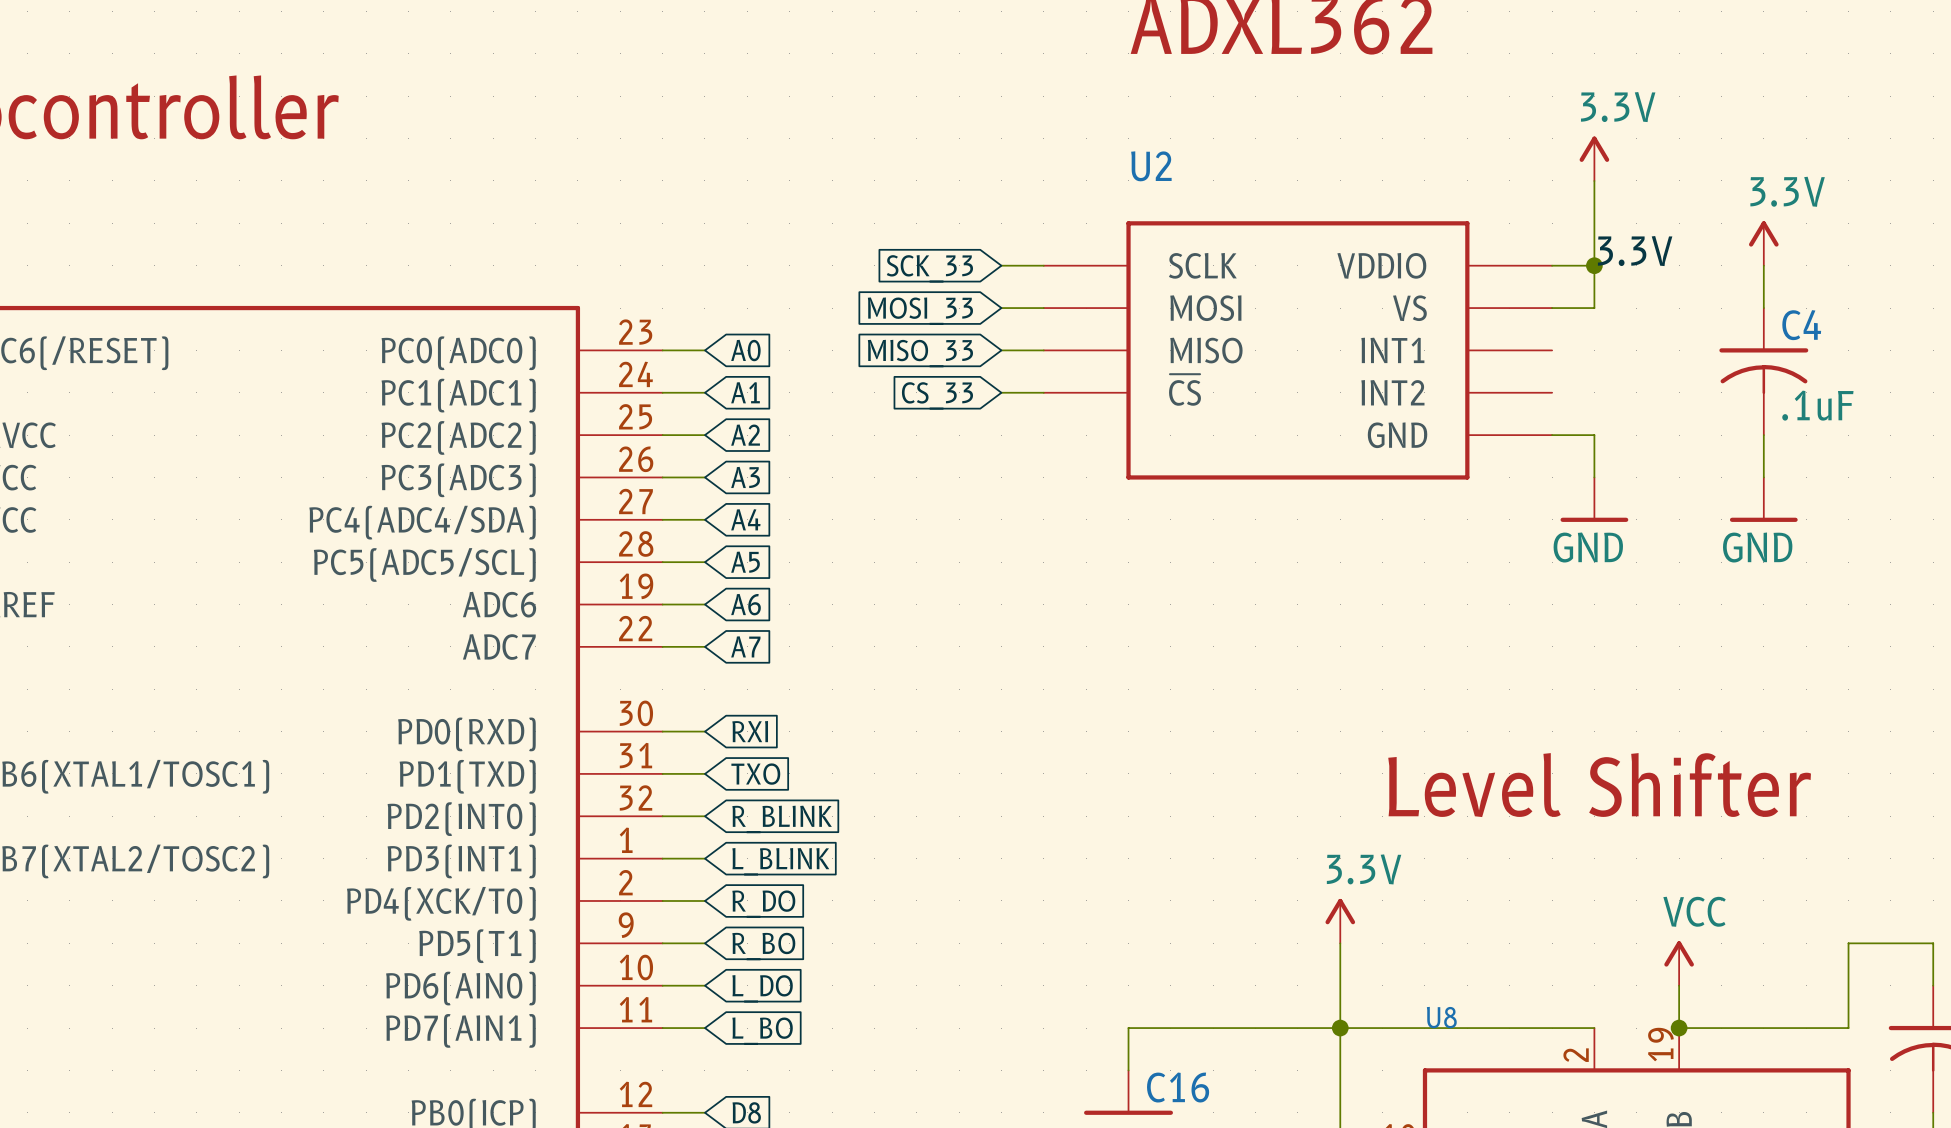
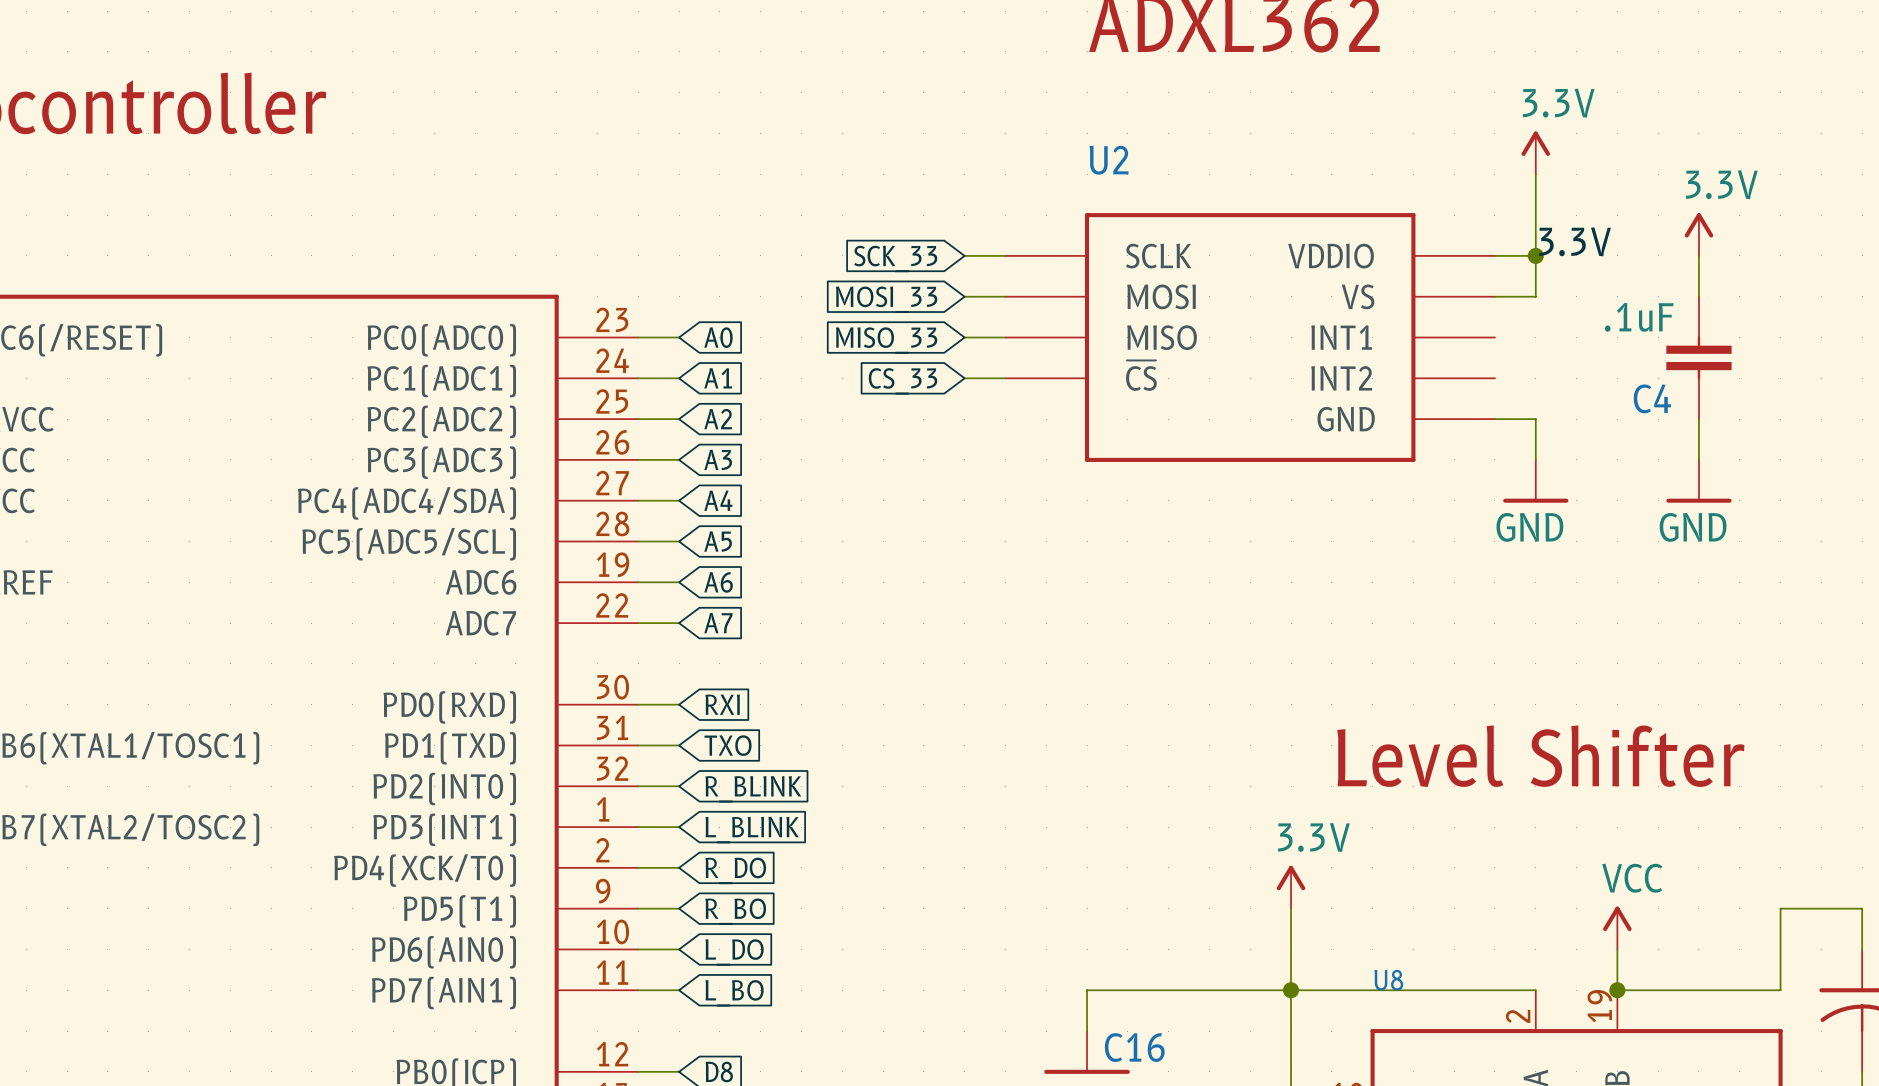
C4 symbol: [1719, 308, 1809, 436] -> [1666, 296, 1732, 420]
C4 name position: C4 (1801, 325) -> C4 (1652, 398)
C4 value position: .1uF (1817, 405) -> .1uF (1639, 317)

